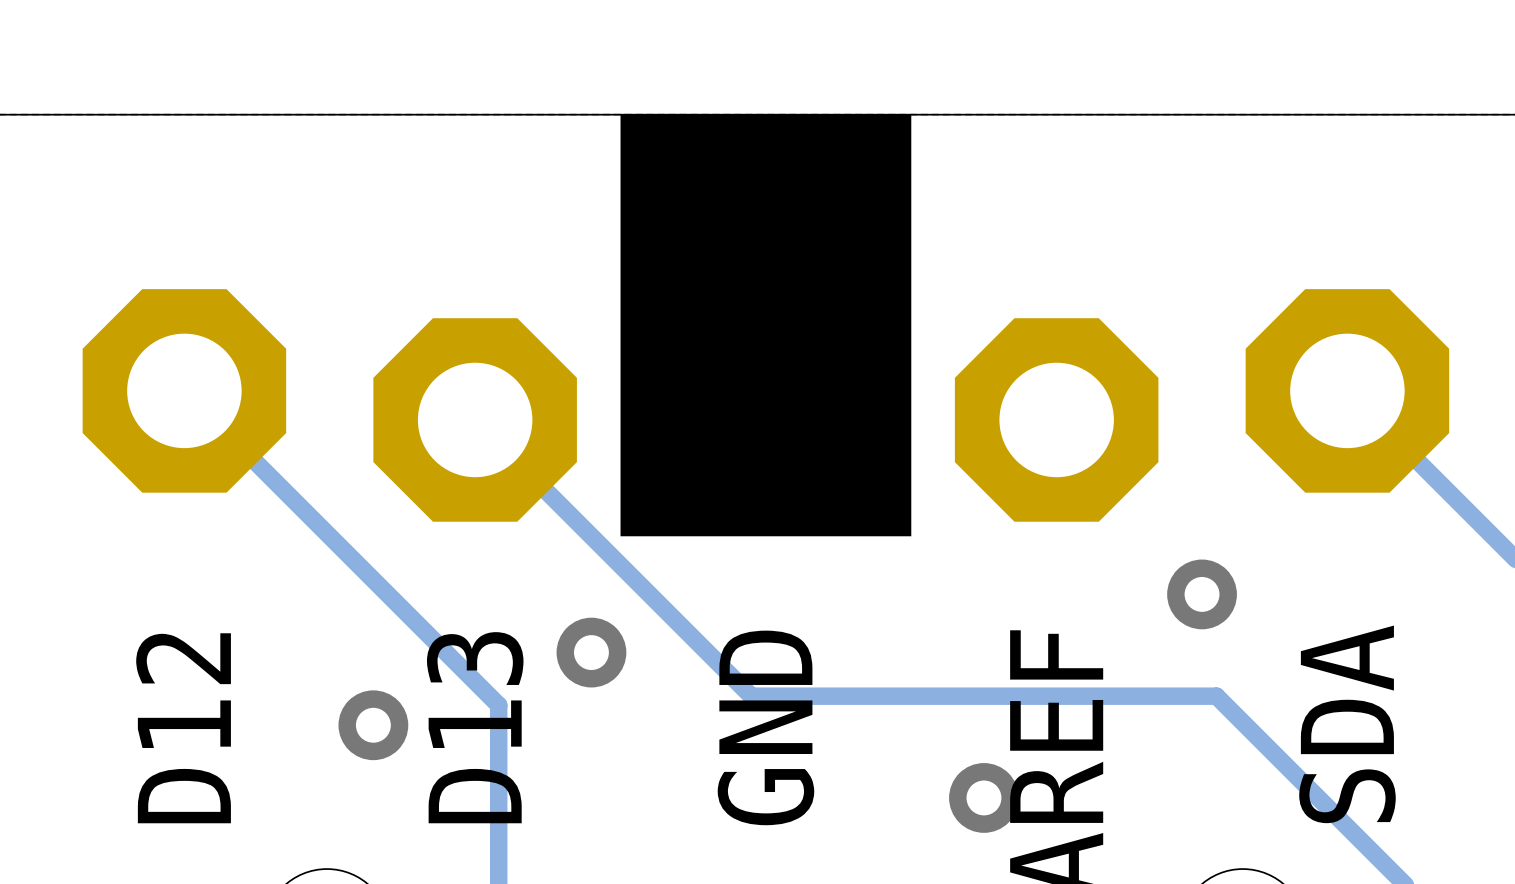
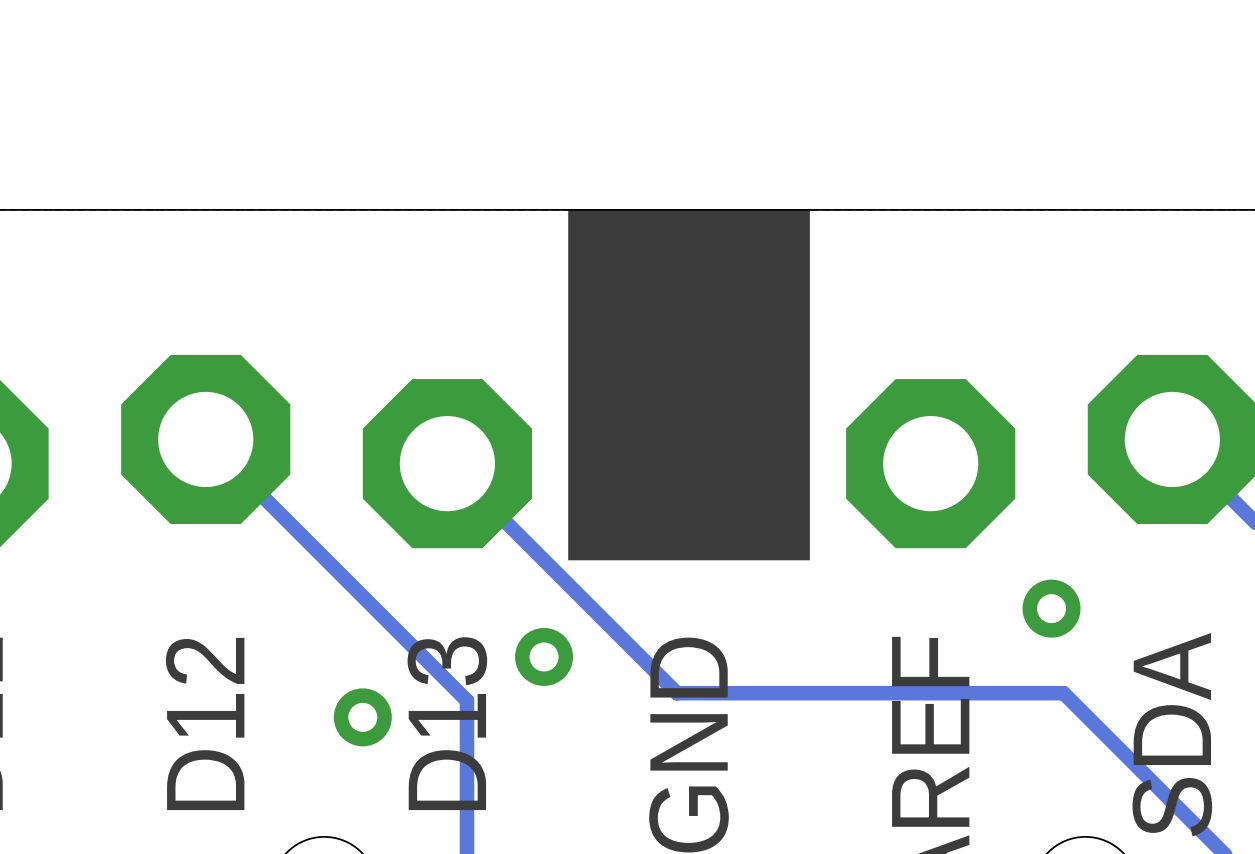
via: (983, 797) -> none

